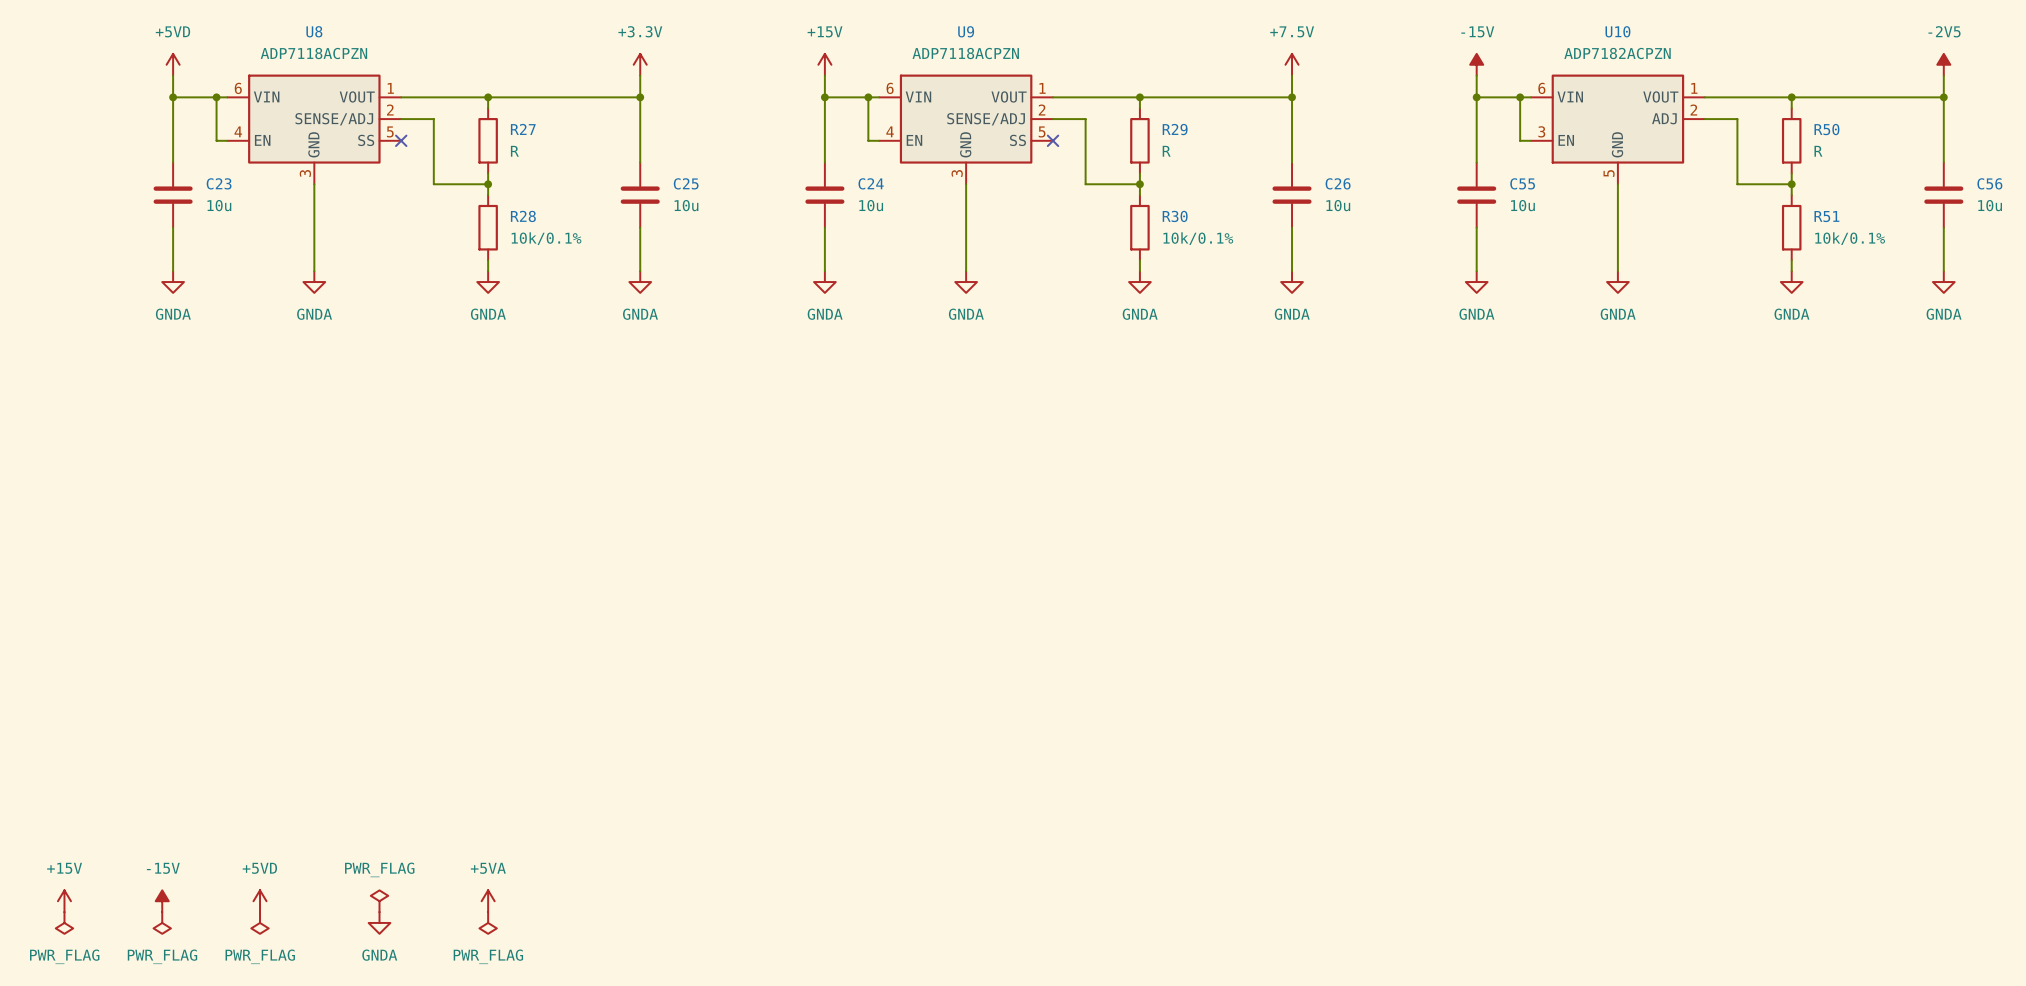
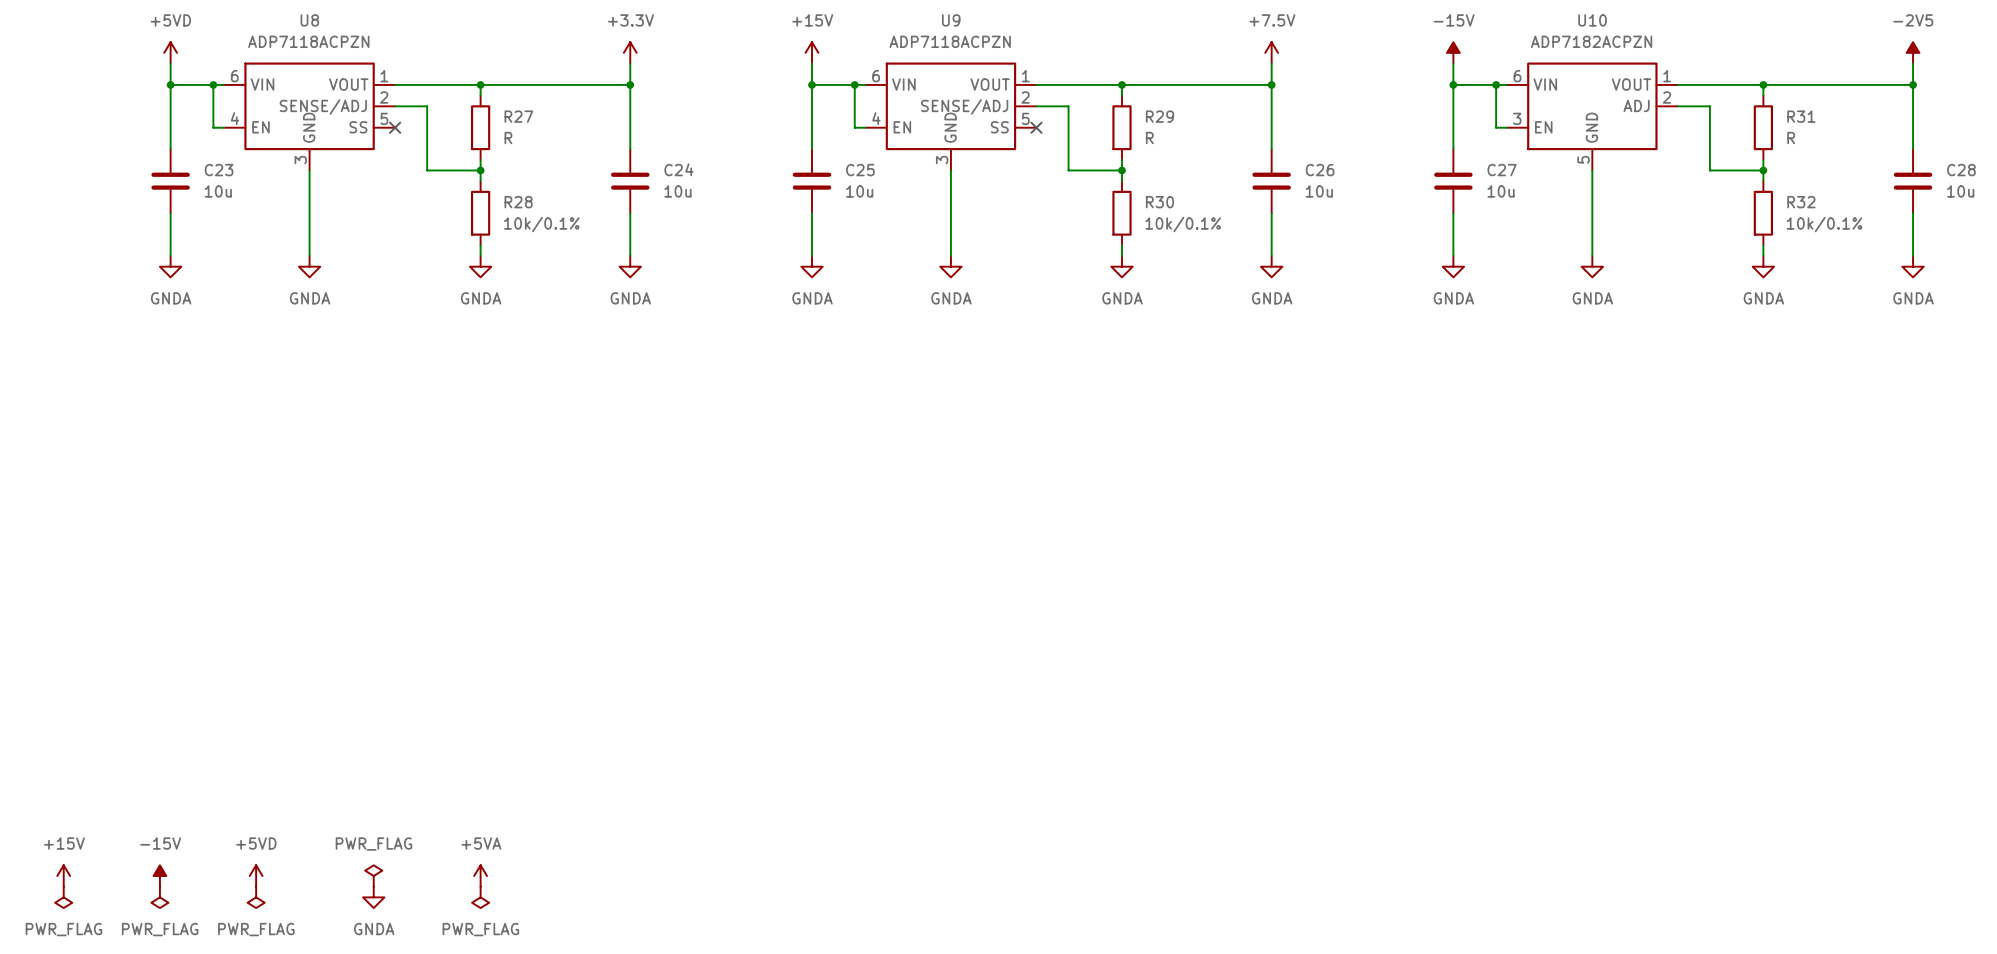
R50 name: R50 (1826, 129) -> R31 (1801, 116)
C25 name: C25 (686, 183) -> C24 (678, 169)
C24 name: C24 (871, 183) -> C25 (860, 170)
C55 name: C55 (1522, 183) -> C27 (1502, 170)
C56 name: C56 (1989, 183) -> C28 (1961, 170)
R51 name: R51 (1826, 216) -> R32 (1801, 202)

